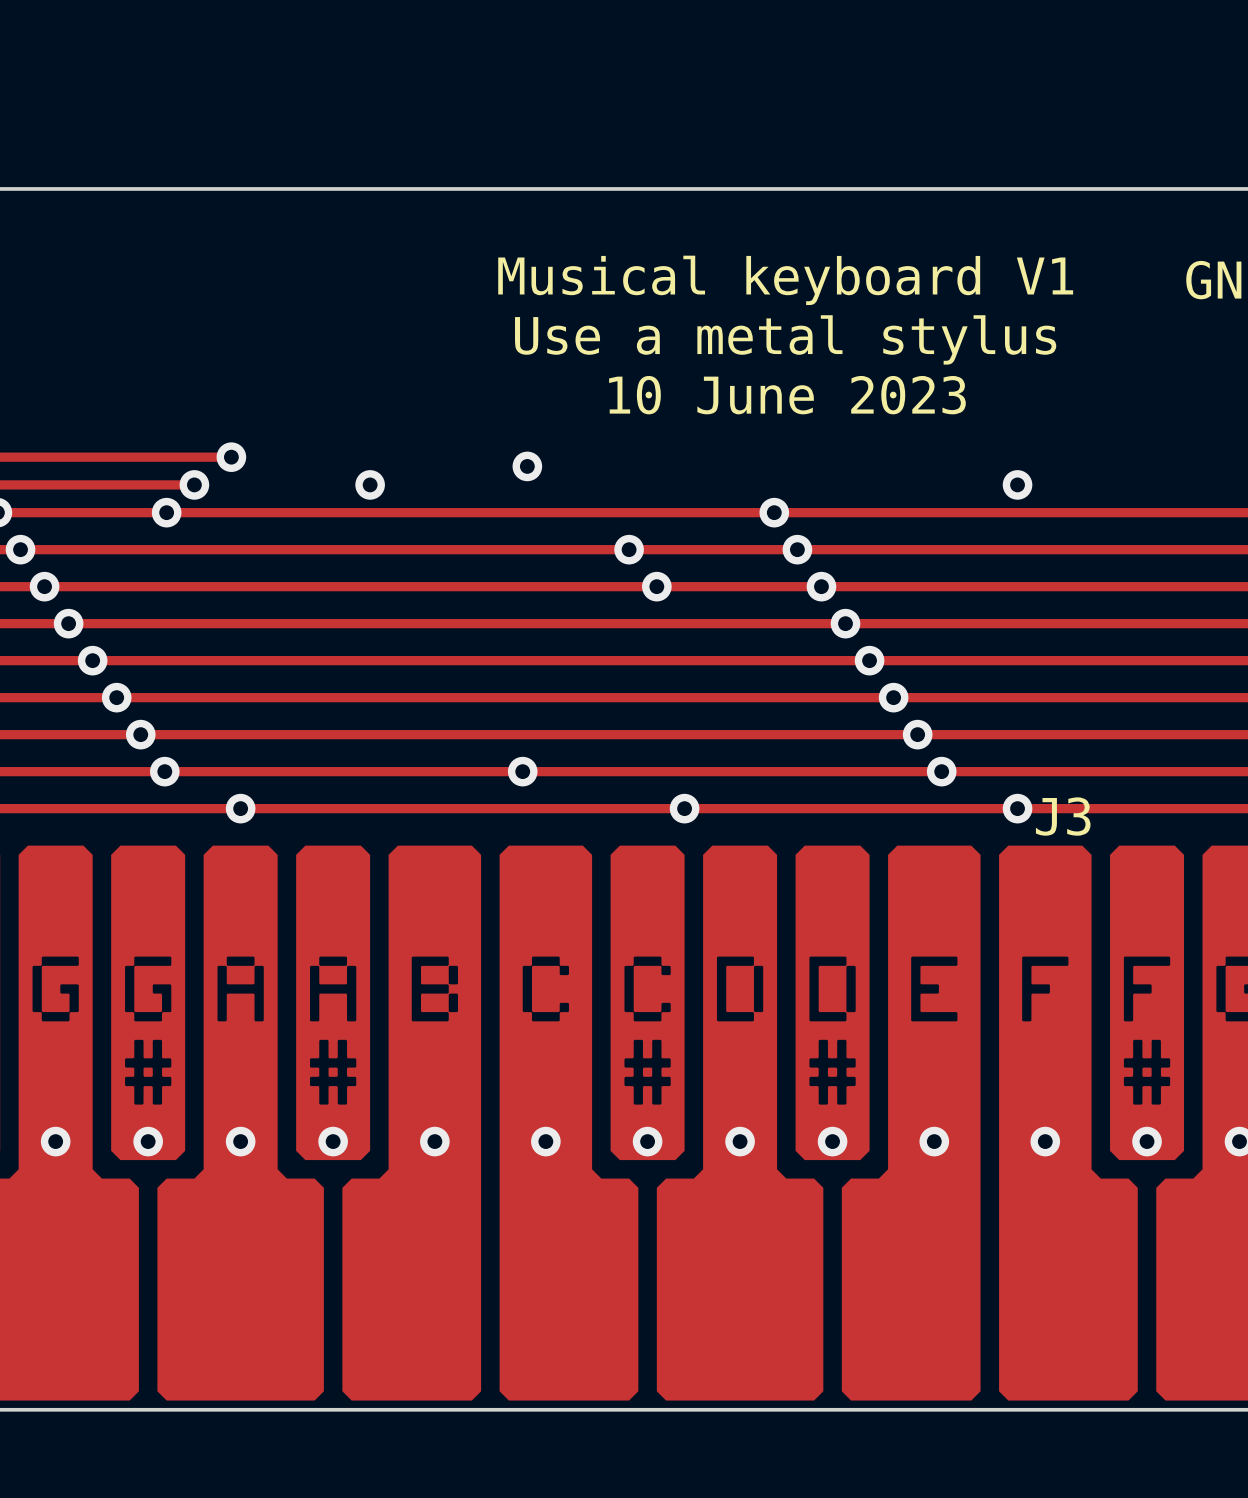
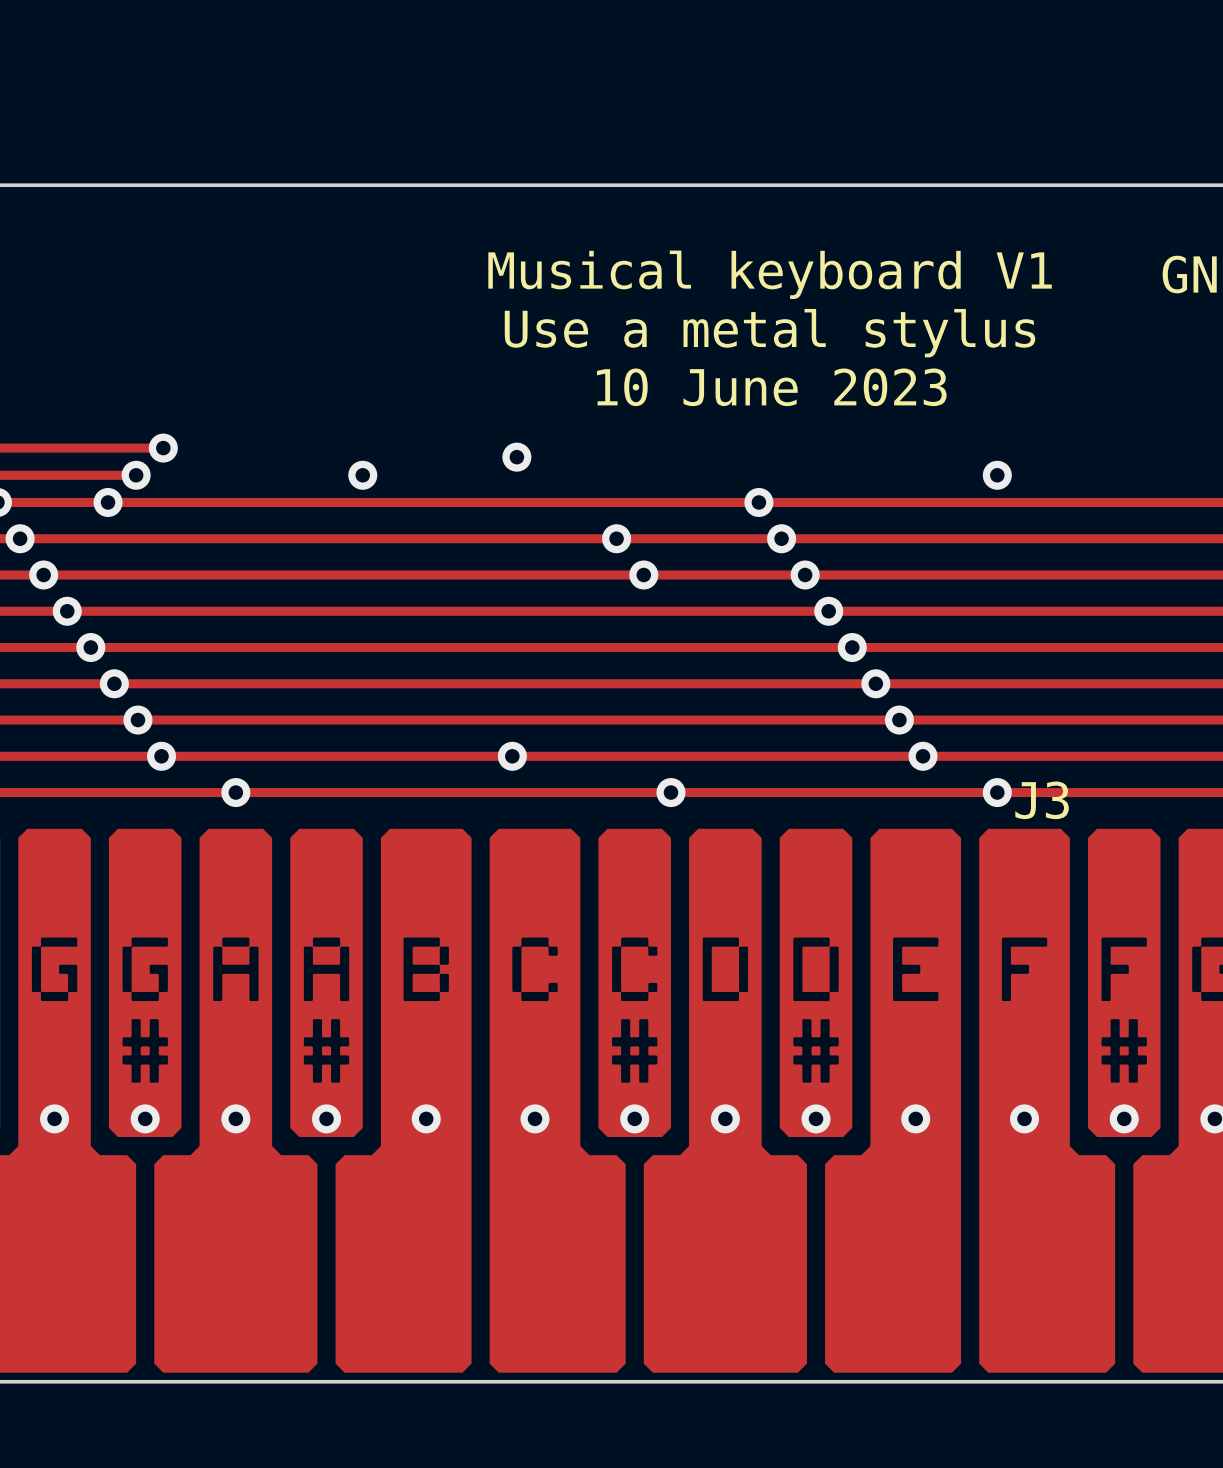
track: (166, 457) (231, 457) -> none
via: none -> (163, 448)
via: (231, 457) -> none
track: (138, 484) (194, 484) -> none
via: none -> (136, 475)
via: (194, 484) -> none
via: none -> (108, 502)
via: (166, 512) -> none

